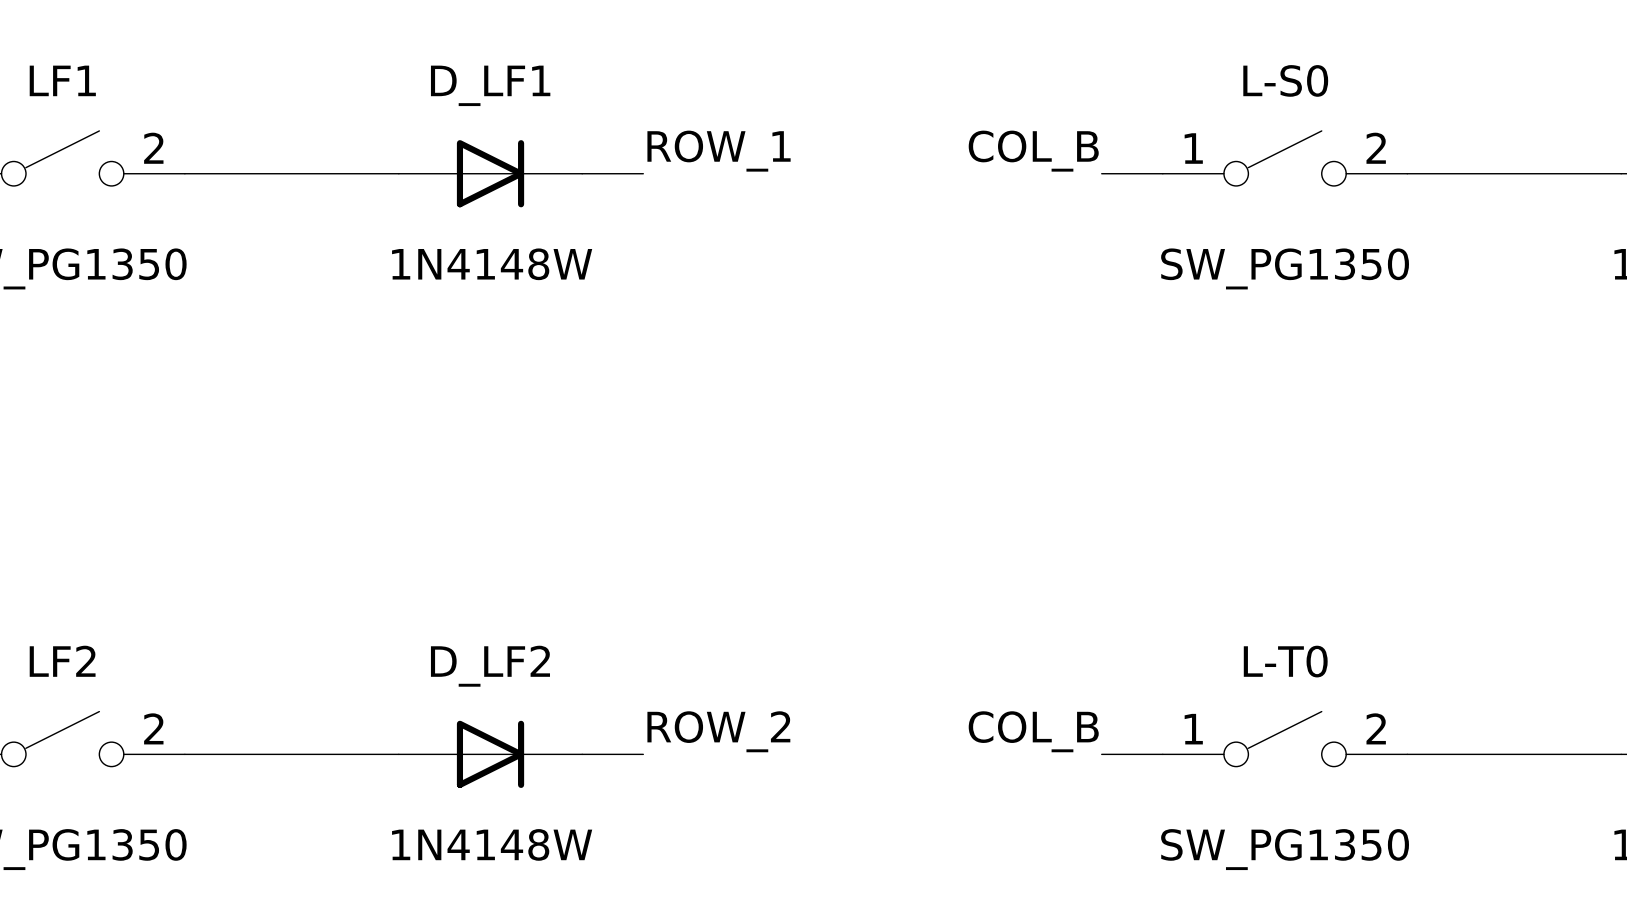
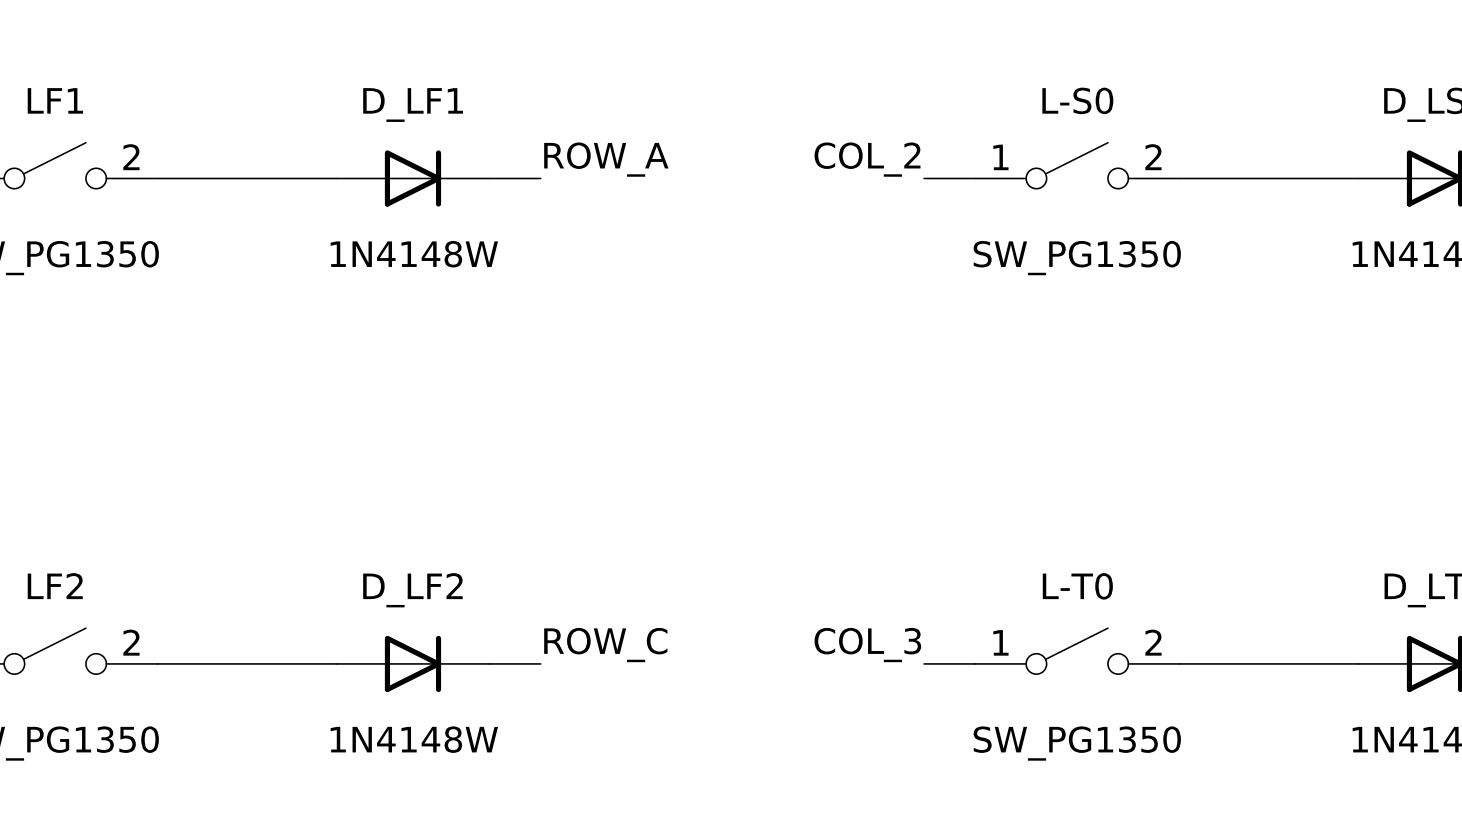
label: ROW_1 (719, 151) -> ROW_A (606, 159)
label: COL_B (1033, 151) -> COL_2 (867, 159)
label: ROW_2 (718, 731) -> ROW_C (605, 645)
label: COL_B (1033, 731) -> COL_3 (867, 645)

